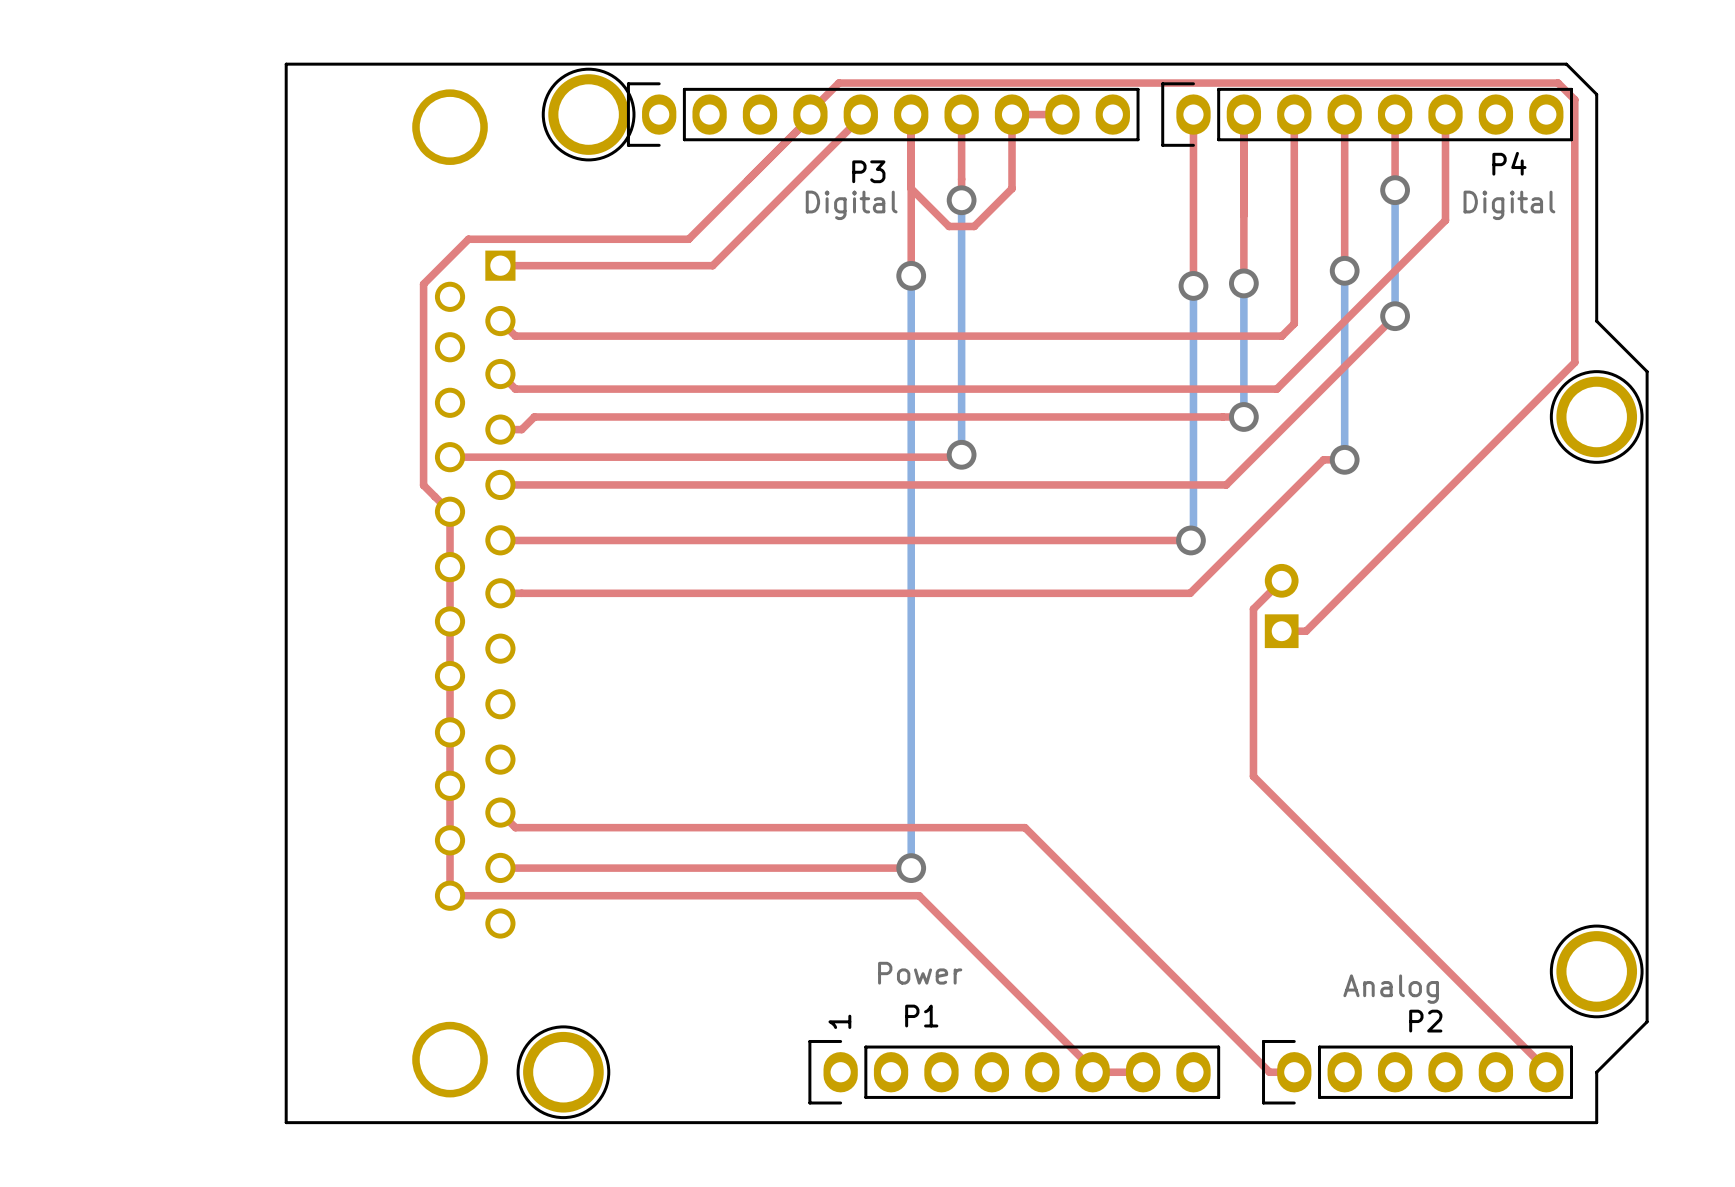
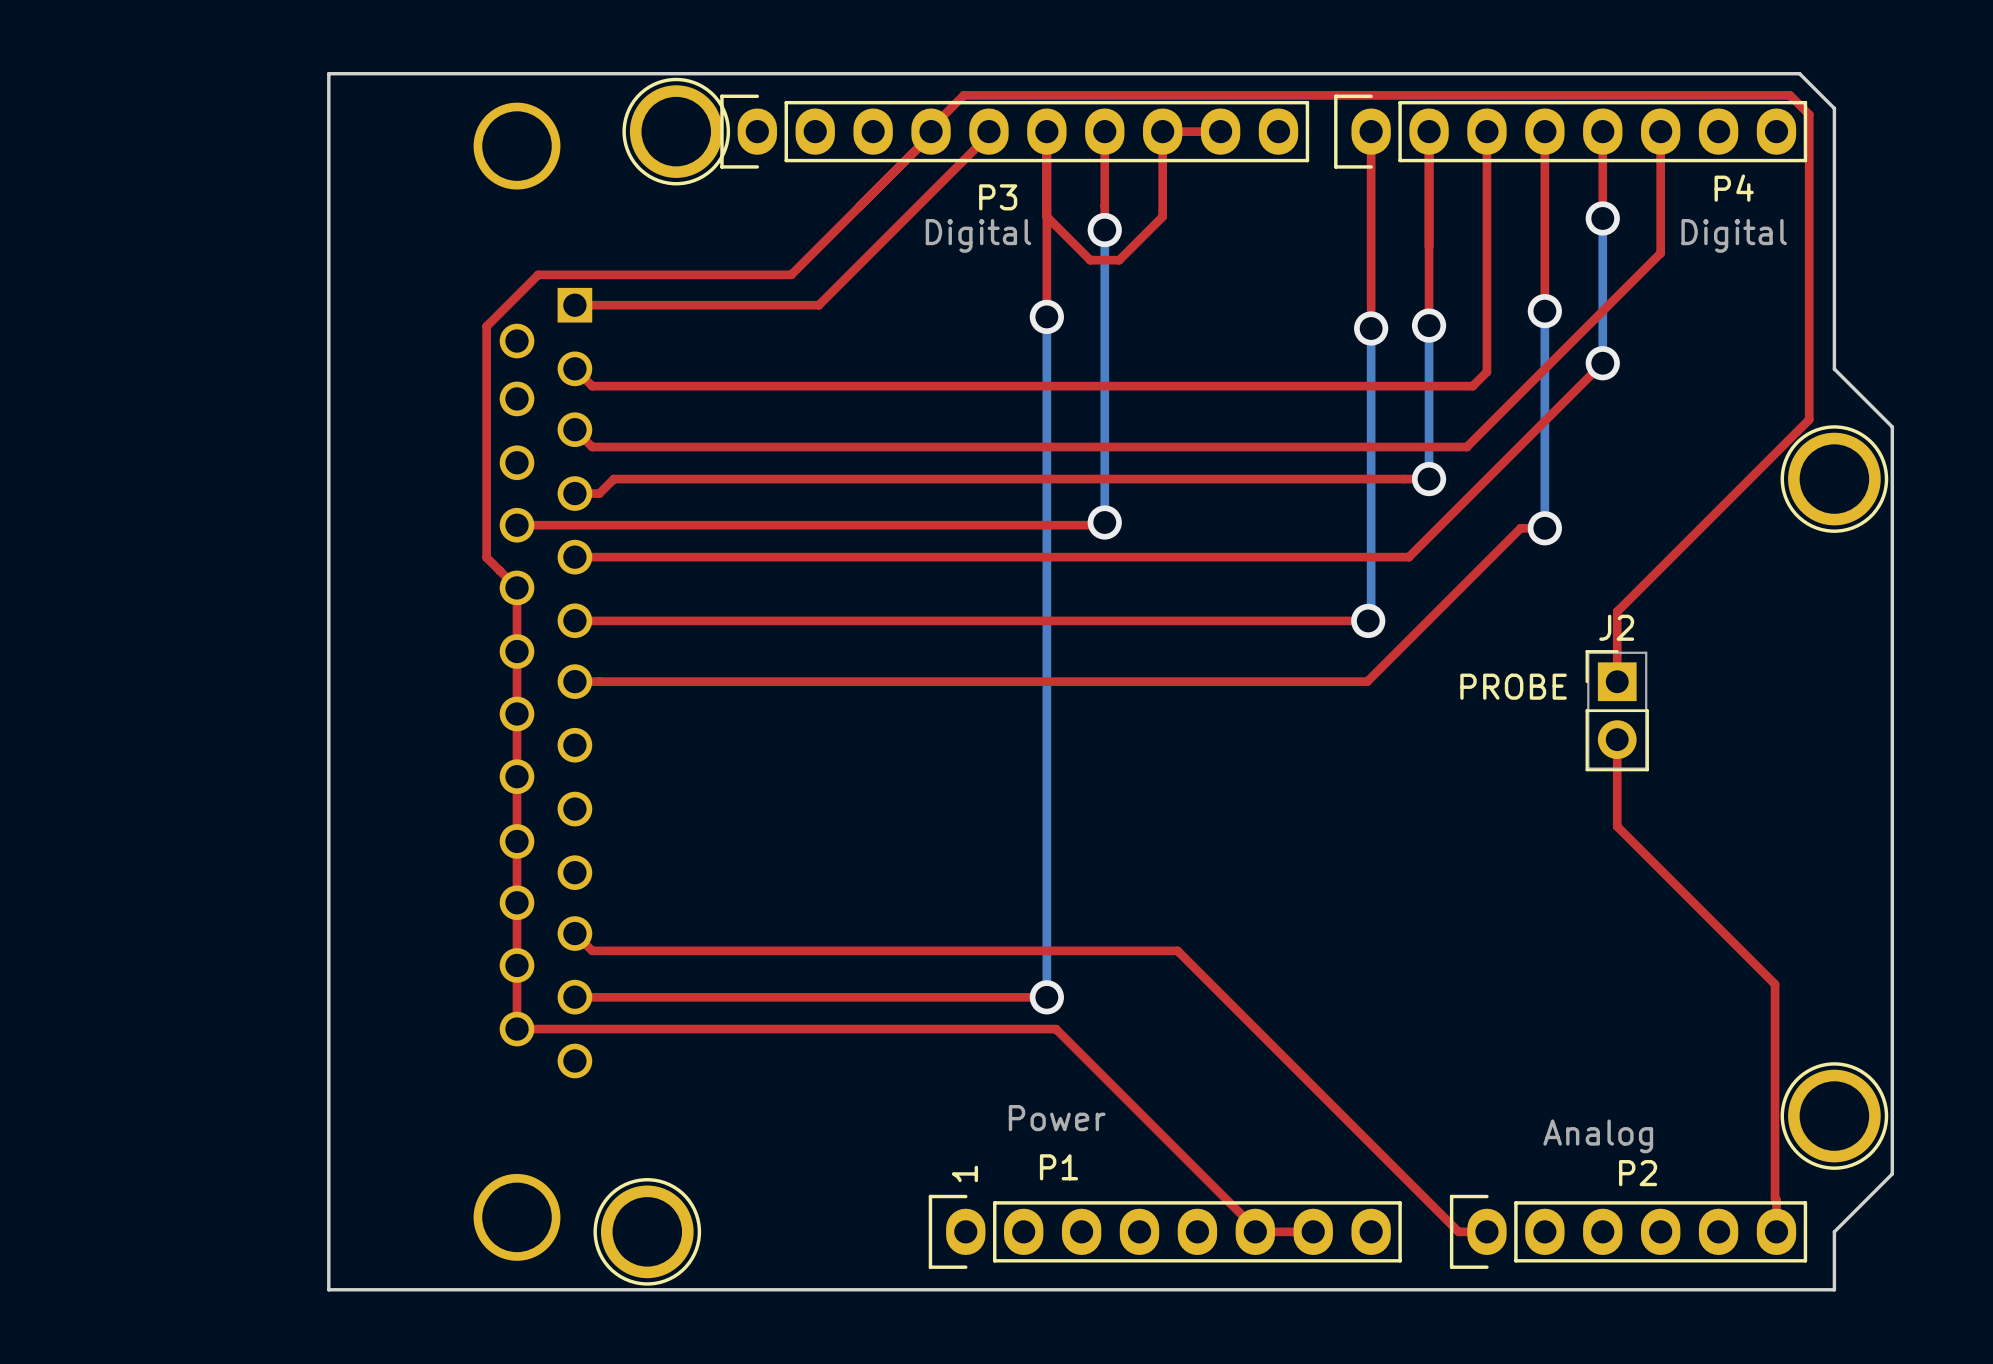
top track: (1574, 362) (1306, 631) (1281, 631) -> (1809, 416) (1809, 419) (1617, 611) (1617, 681)
top track: (1281, 580) (1253, 609) (1253, 776) (1546, 1069) -> (1617, 739) (1617, 826) (1775, 984) (1776, 1228)
J2 side: bottom (1281, 606) -> top (1617, 710)

